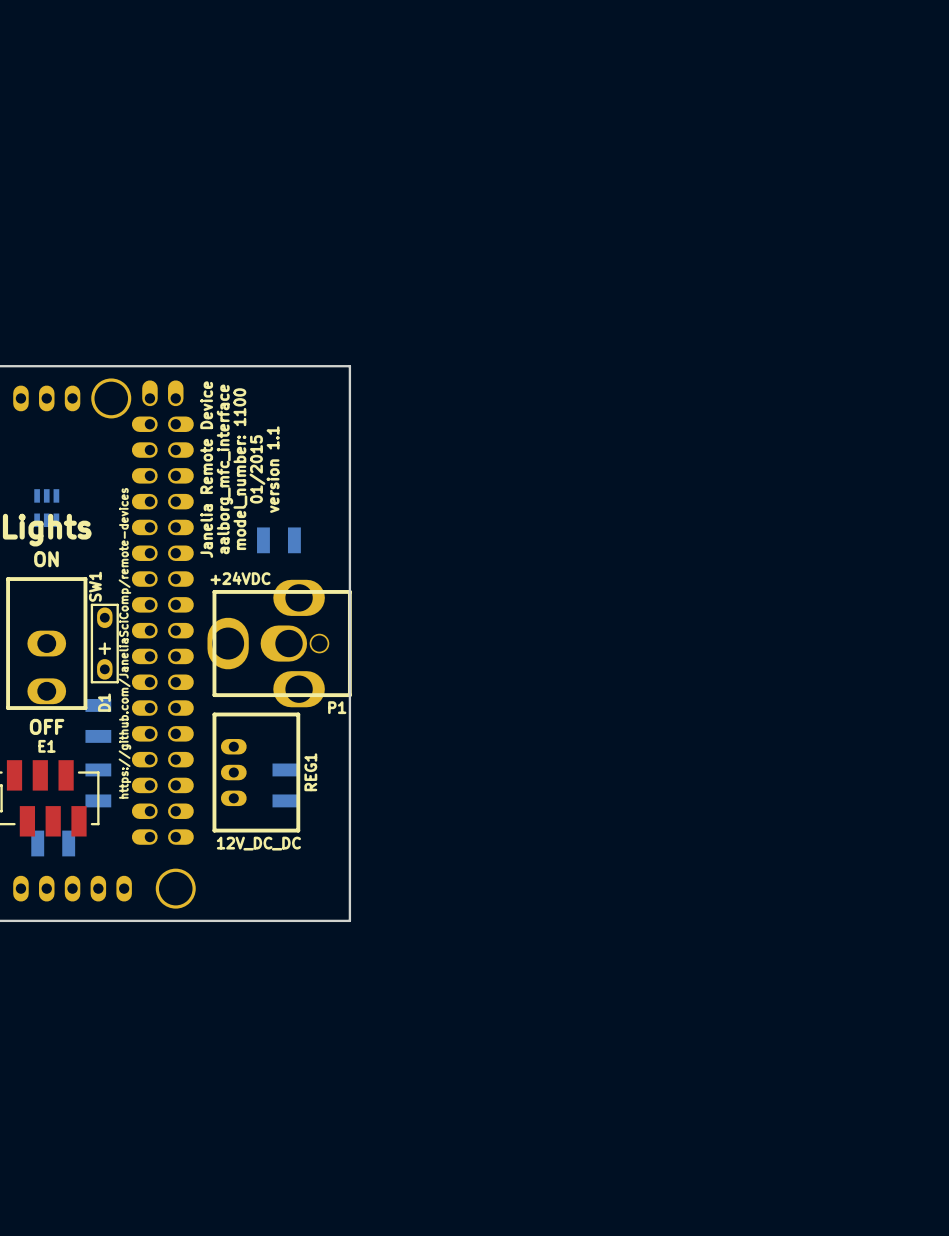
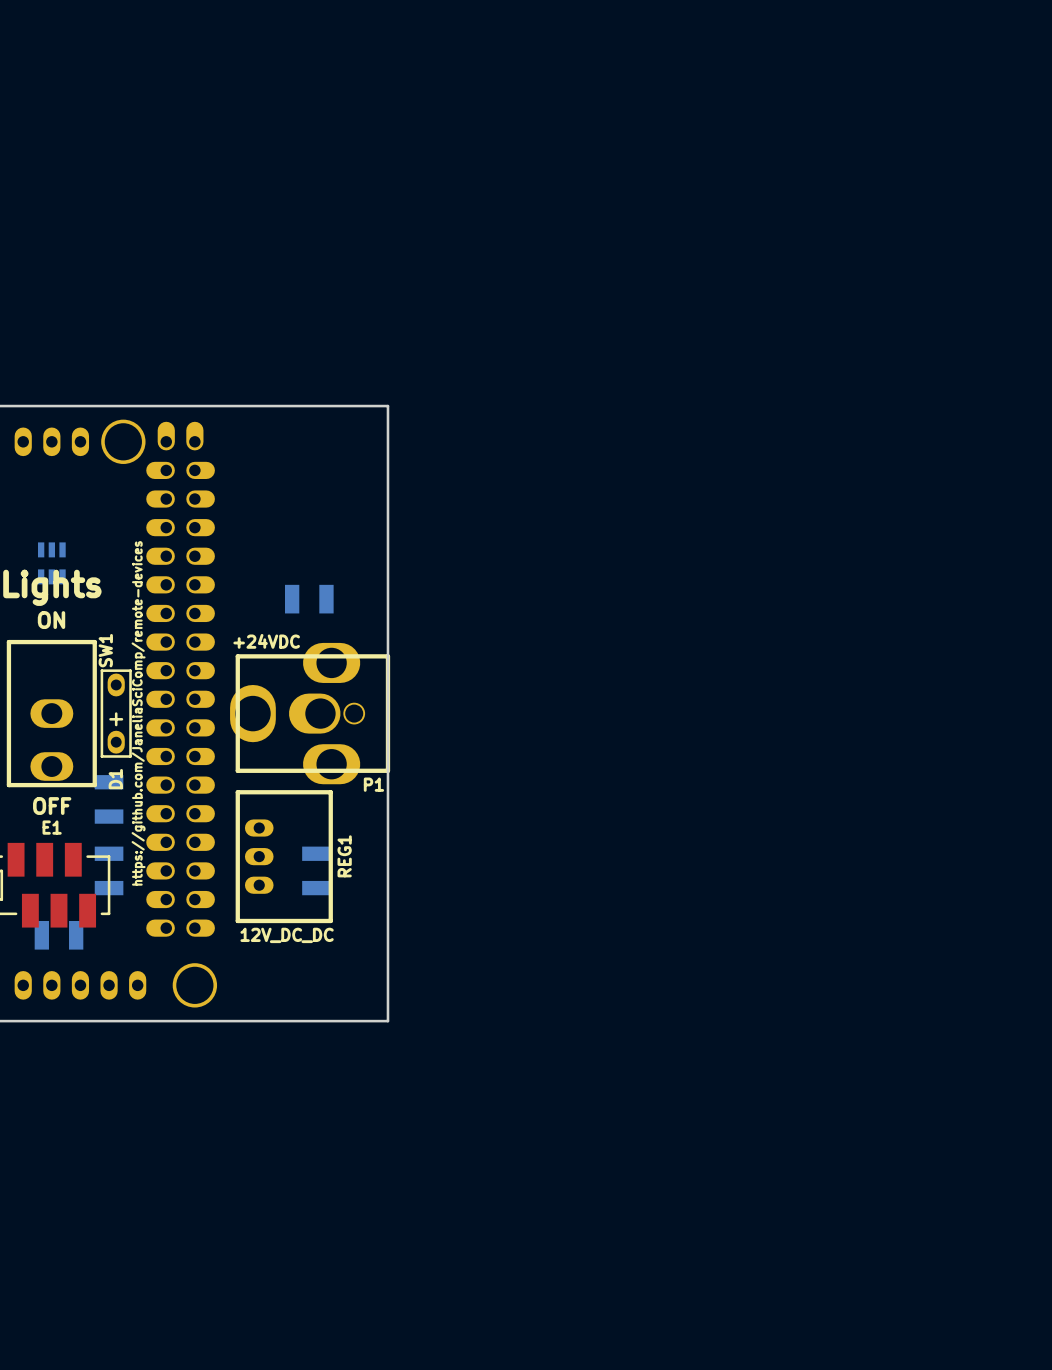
text: Janelia Remote Device (206, 469) -> none
text: aalborg_mfc_interface (224, 469) -> none
text: model_number: 1100 (240, 469) -> none
text: 01/2015 (257, 469) -> none
text: version 1.1 (273, 469) -> none

